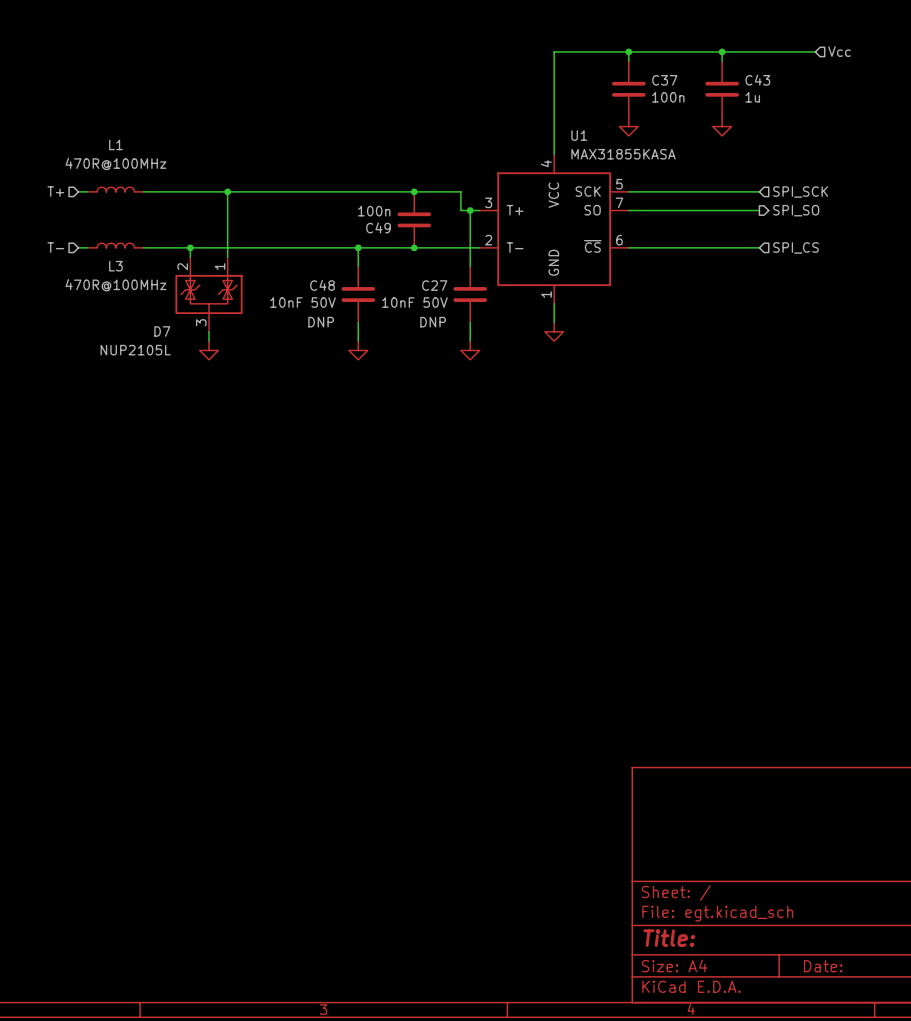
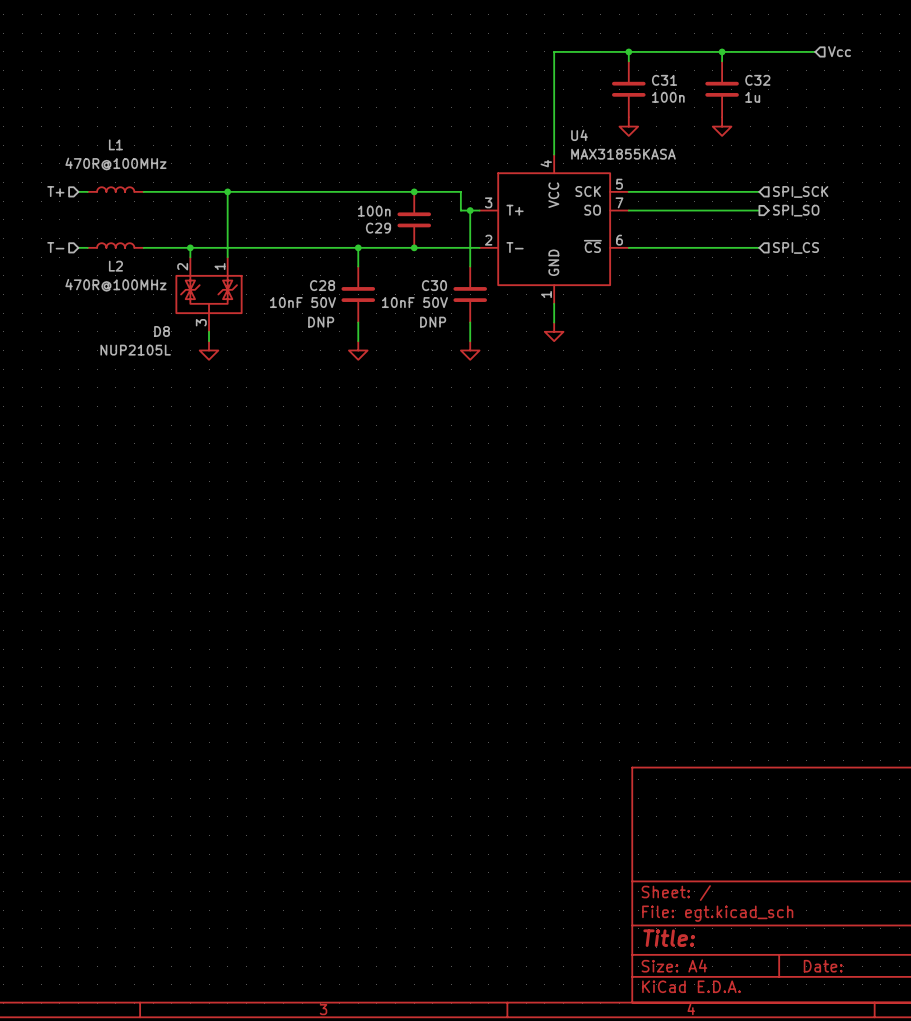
C37 name: C37 (664, 80) -> C31 (664, 80)
C43 name: C43 (757, 80) -> C32 (757, 80)
U1 name: U1 (579, 135) -> U4 (579, 135)
C49 name: C49 (378, 227) -> C29 (378, 228)
L3 name: L3 (115, 266) -> L2 (115, 266)
C48 name: C48 (322, 285) -> C28 (322, 285)
C27 name: C27 (434, 285) -> C30 (434, 285)
D7 name: D7 (162, 331) -> D8 (162, 331)

